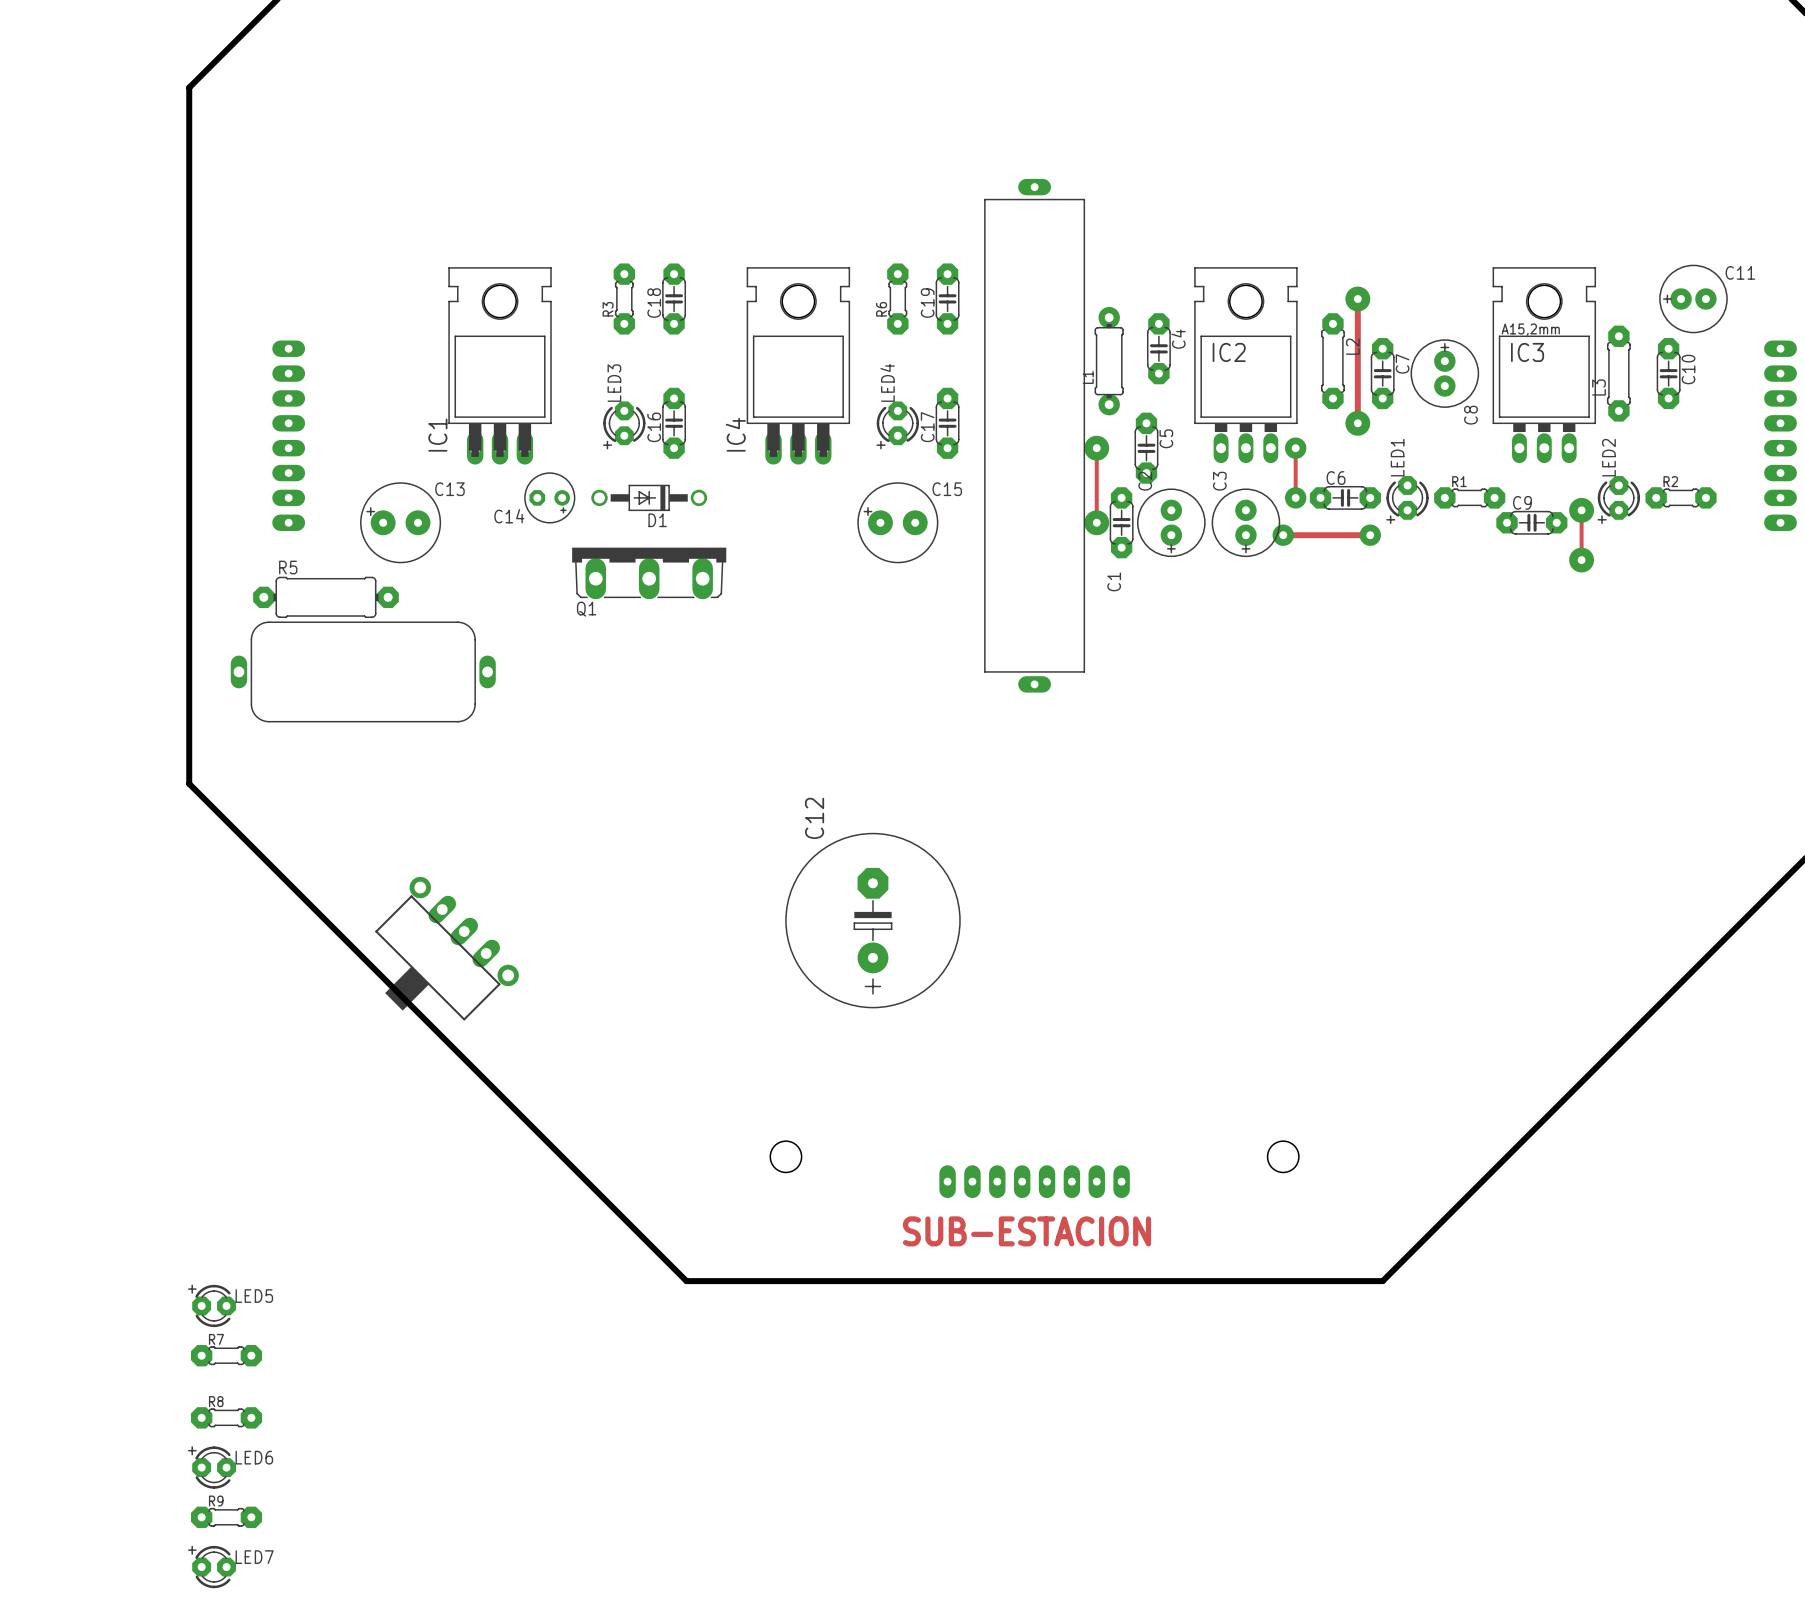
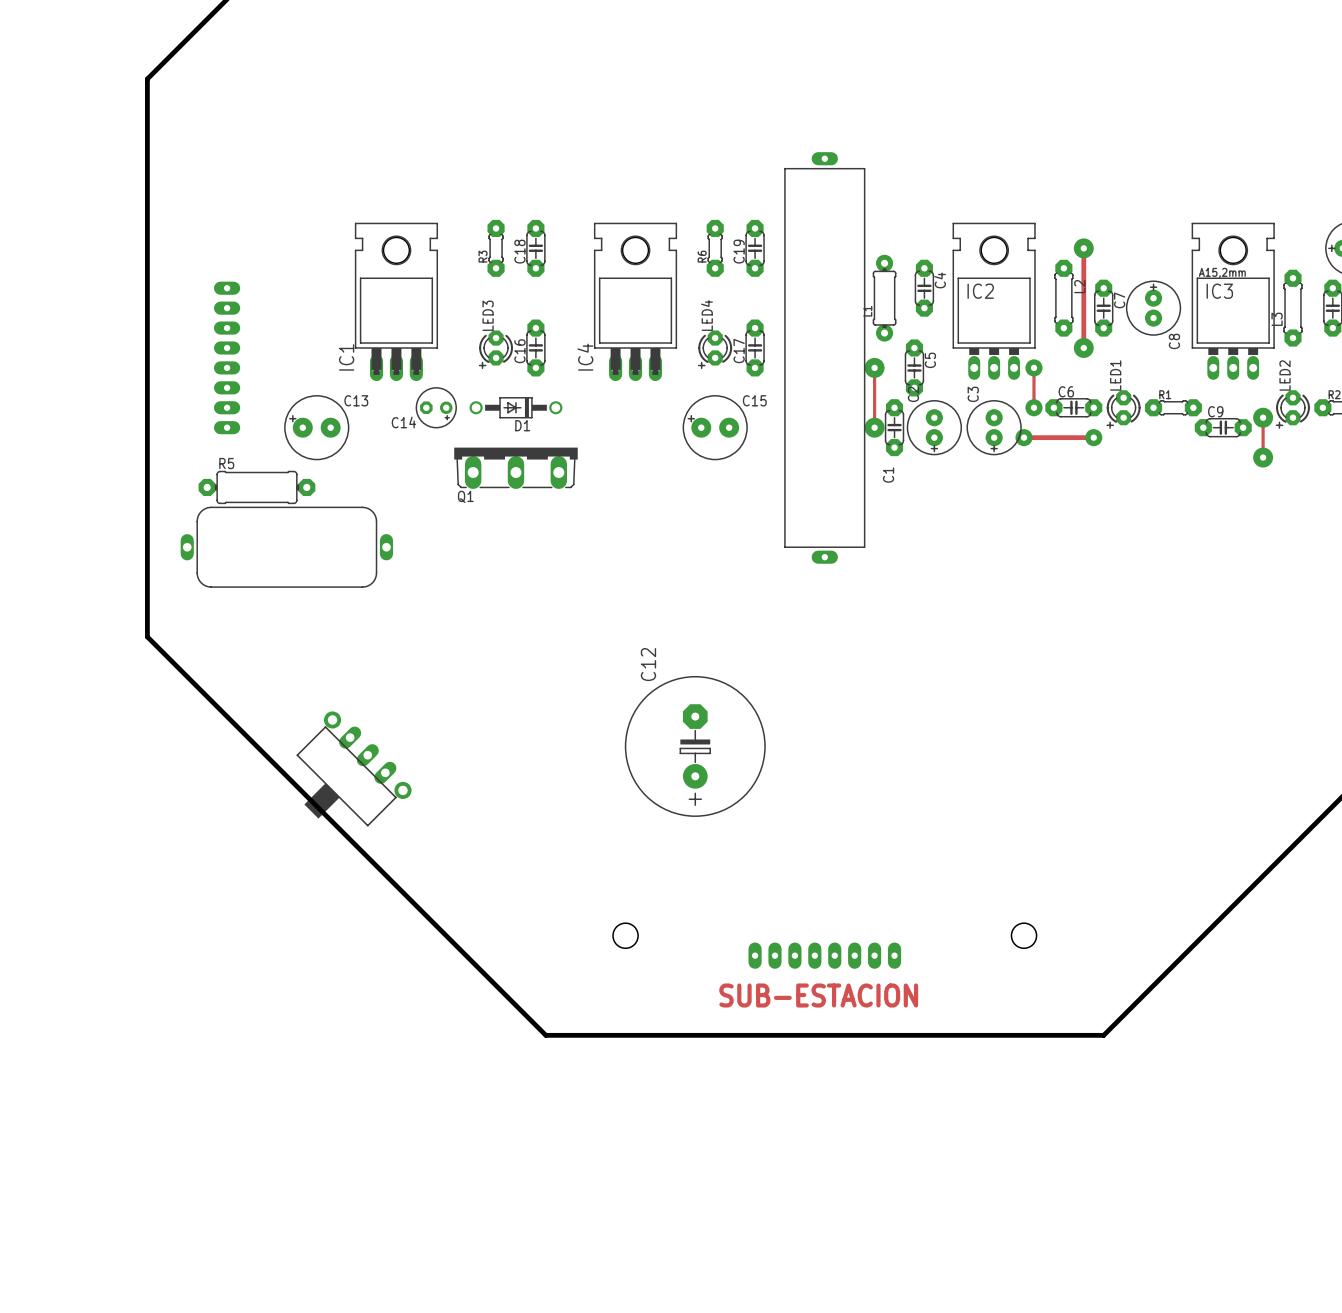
LED5: (212, 1305) -> none
R7: (226, 1355) -> none
R8: (226, 1417) -> none
LED6: (212, 1467) -> none
R9: (226, 1517) -> none
LED7: (212, 1566) -> none

